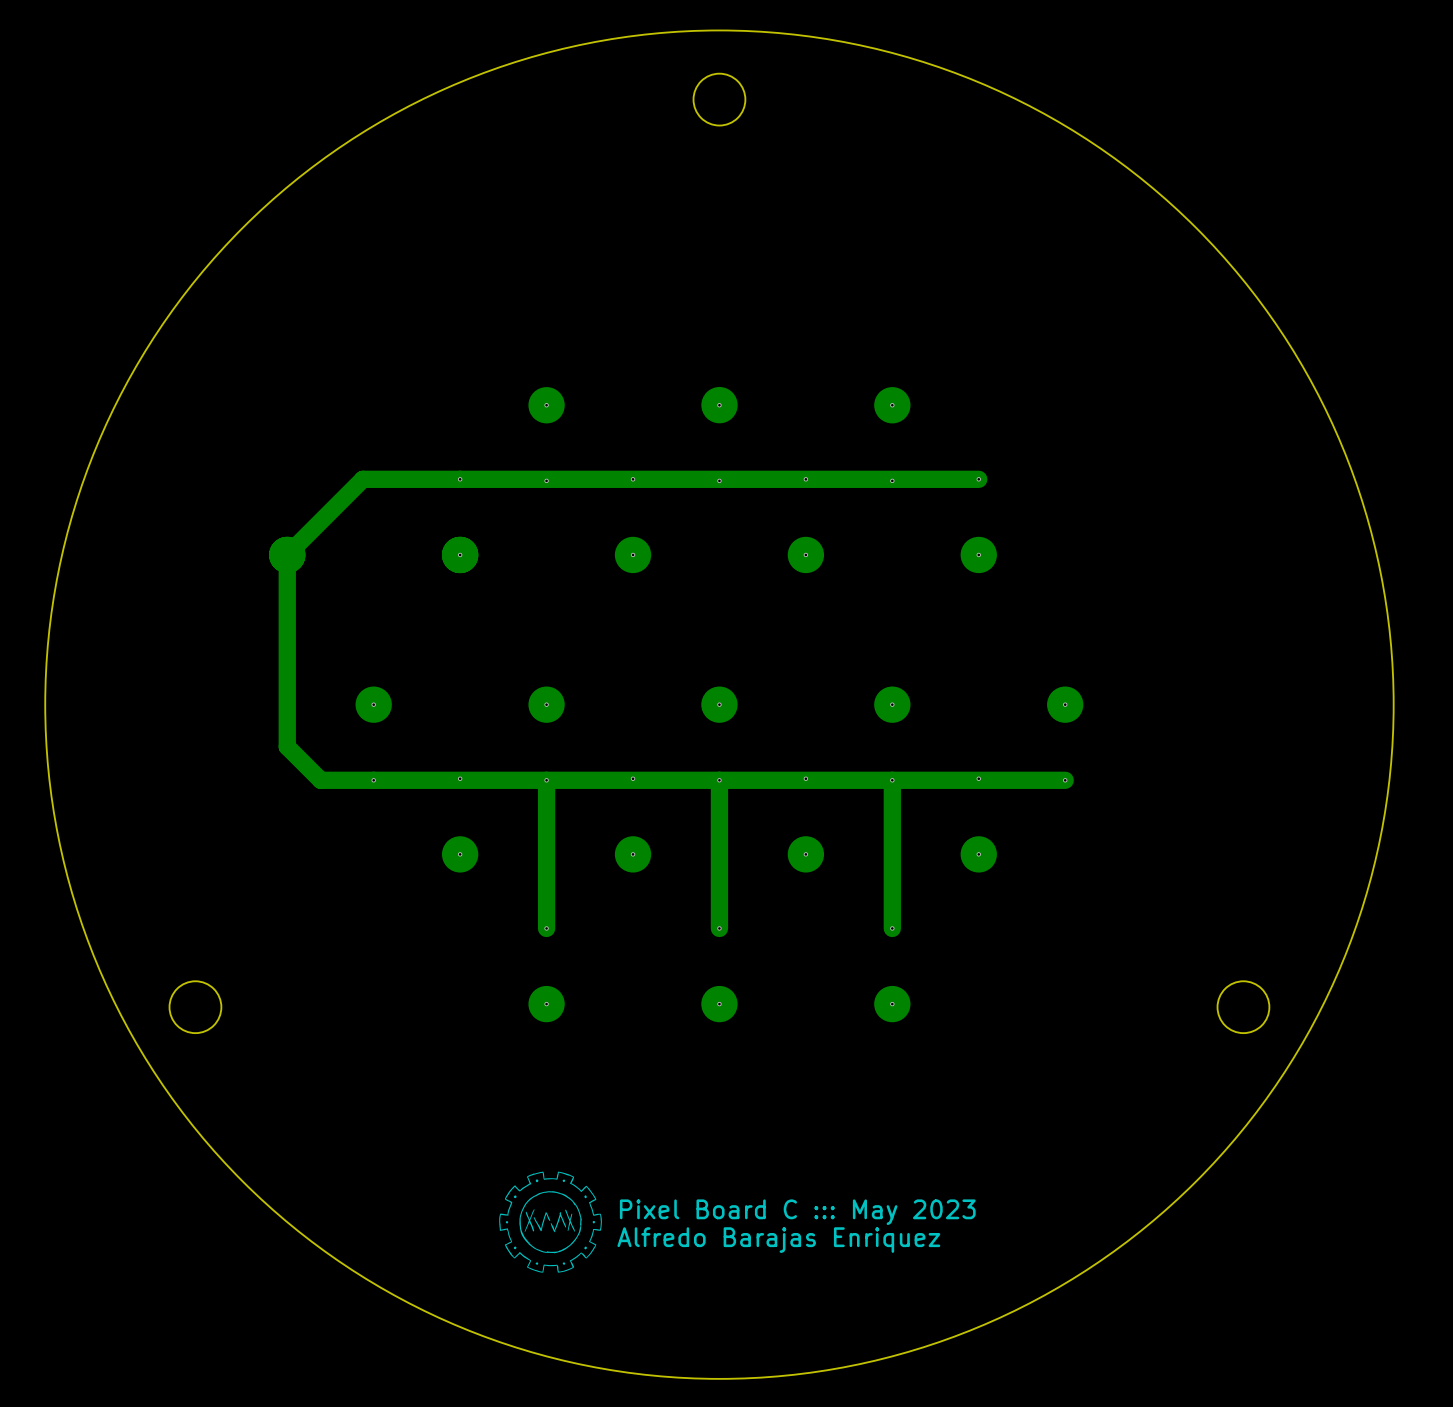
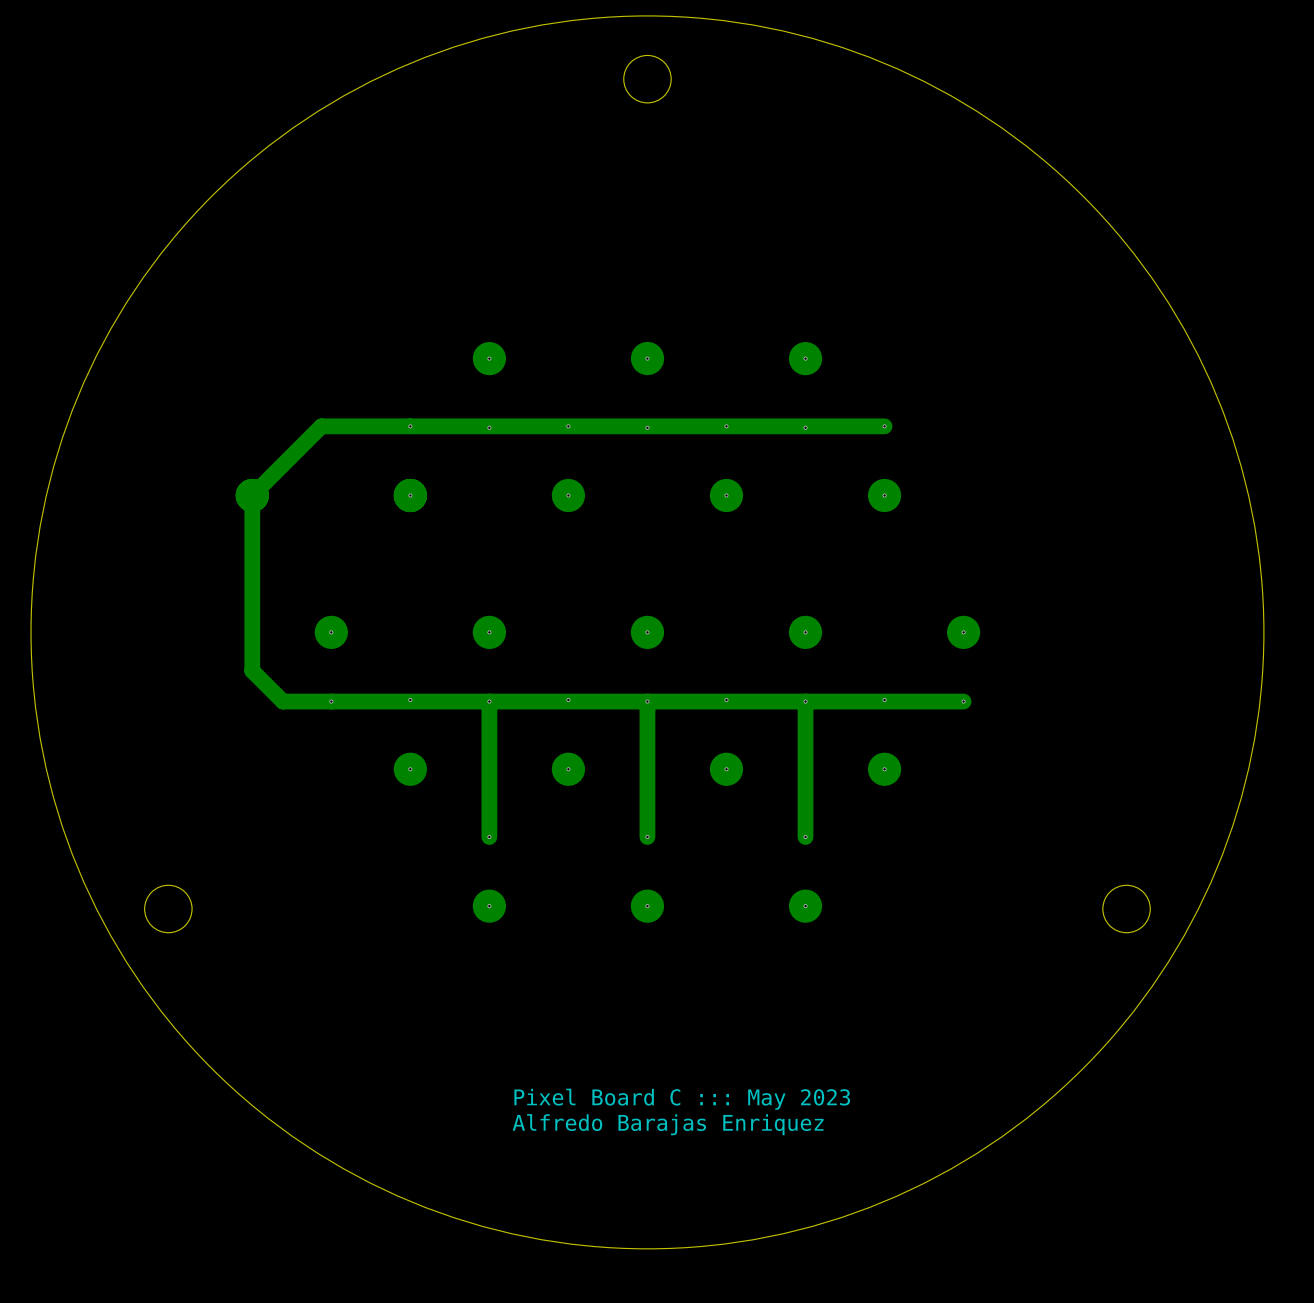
drawing: [499, 1171, 602, 1273] -> none
text position: Pixel Board C ::: May 2023 (797, 1212) -> Pixel Board C ::: May 2023 (682, 1099)
text position: Alfredo Barajas Enriquez (778, 1240) -> Alfredo Barajas Enriquez (668, 1124)

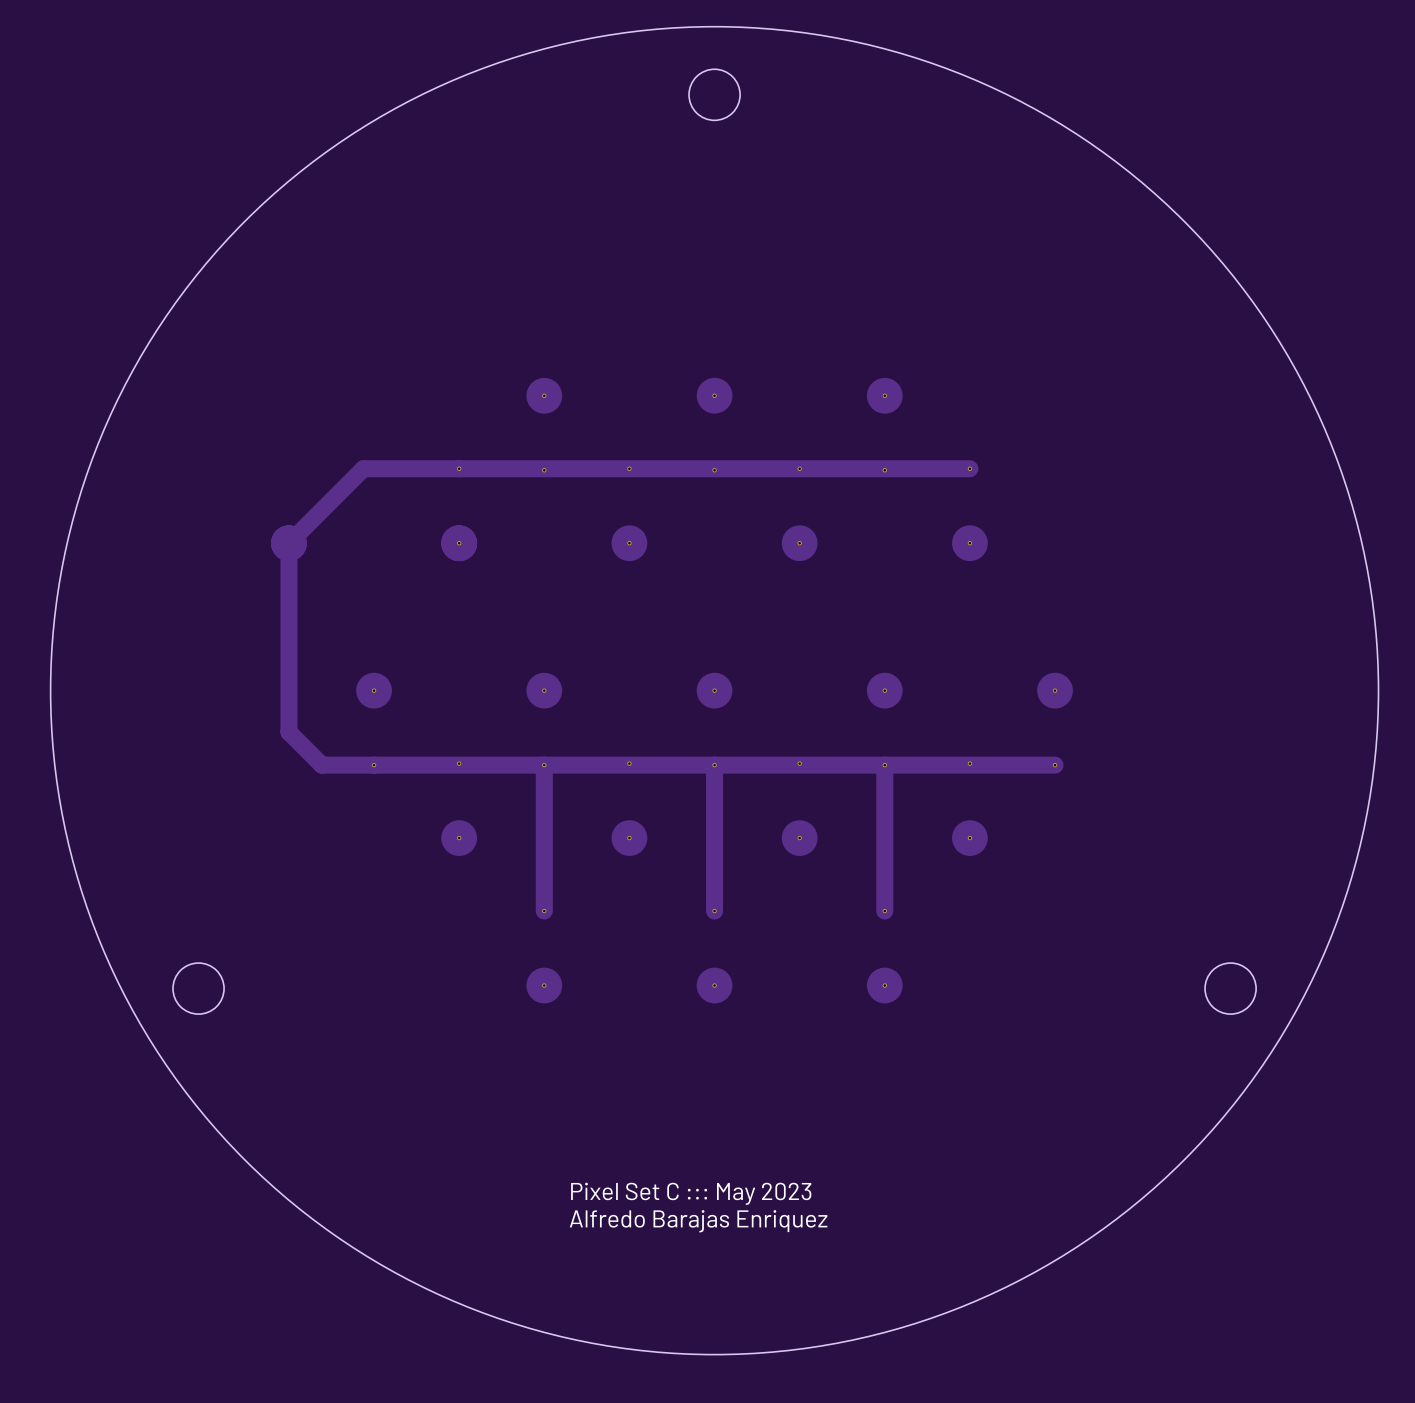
text: Pixel Board C ::: May 2023 (682, 1099) -> Pixel Set C ::: May 2023 (691, 1193)

